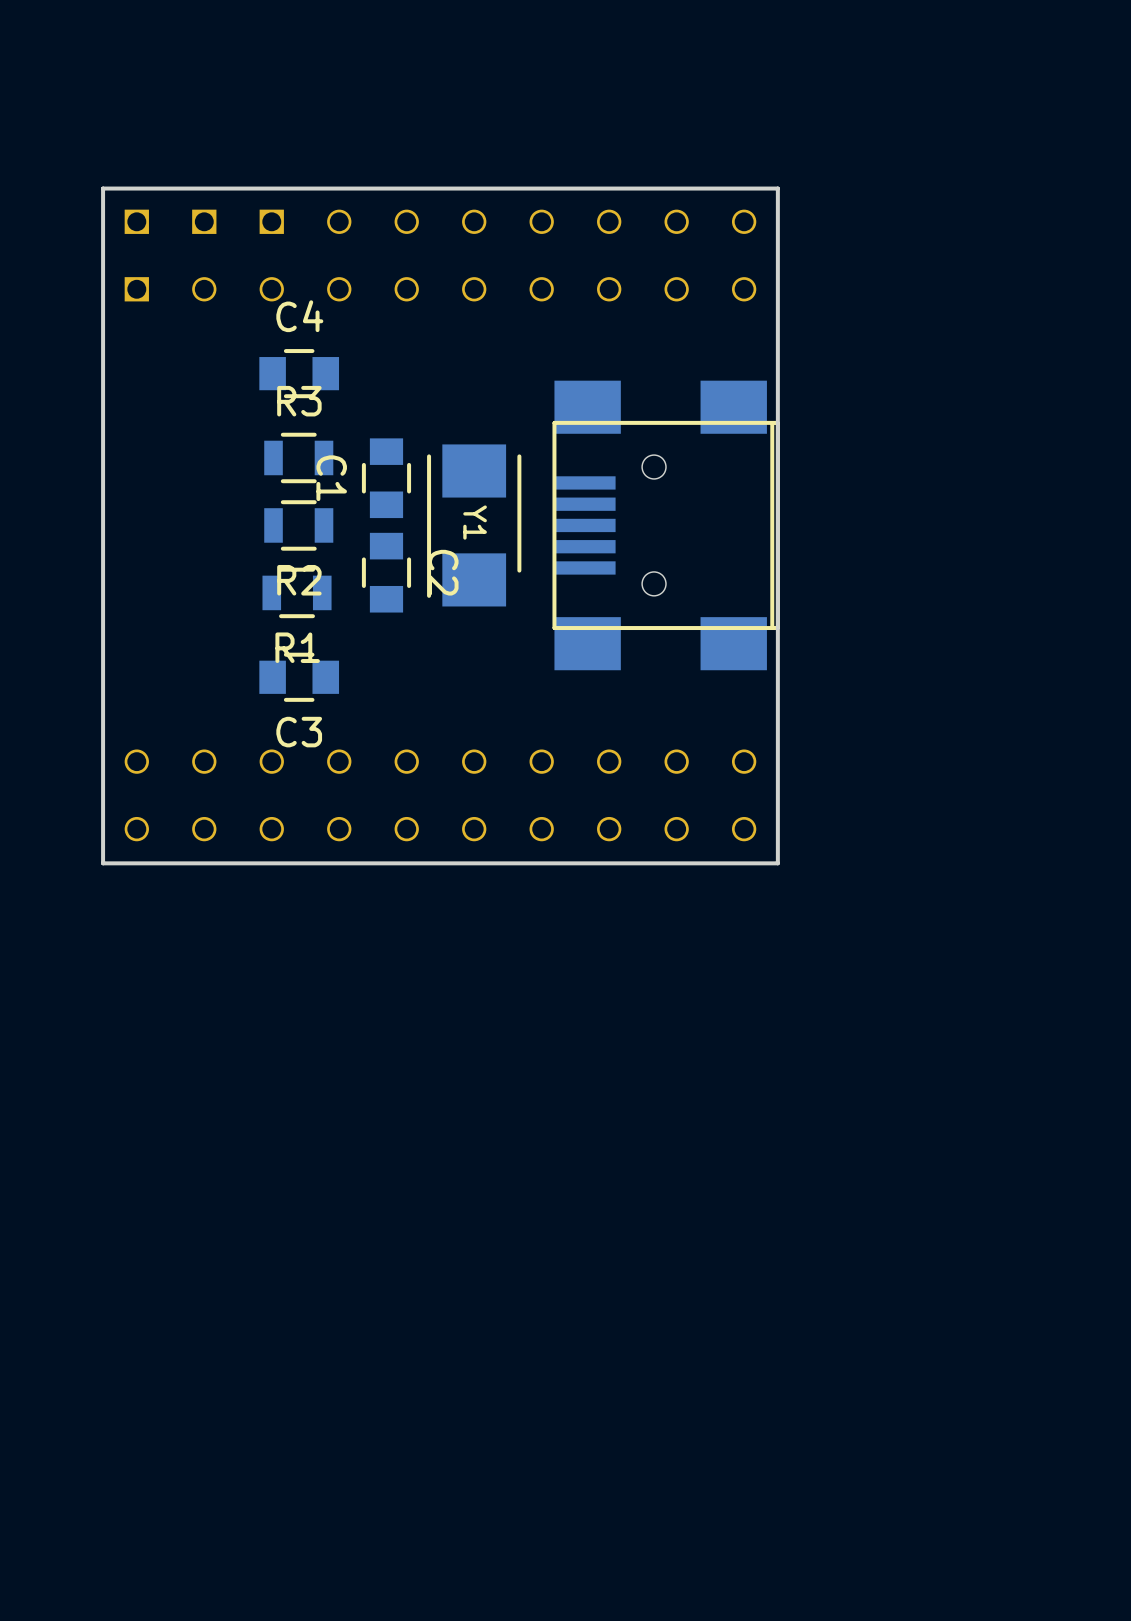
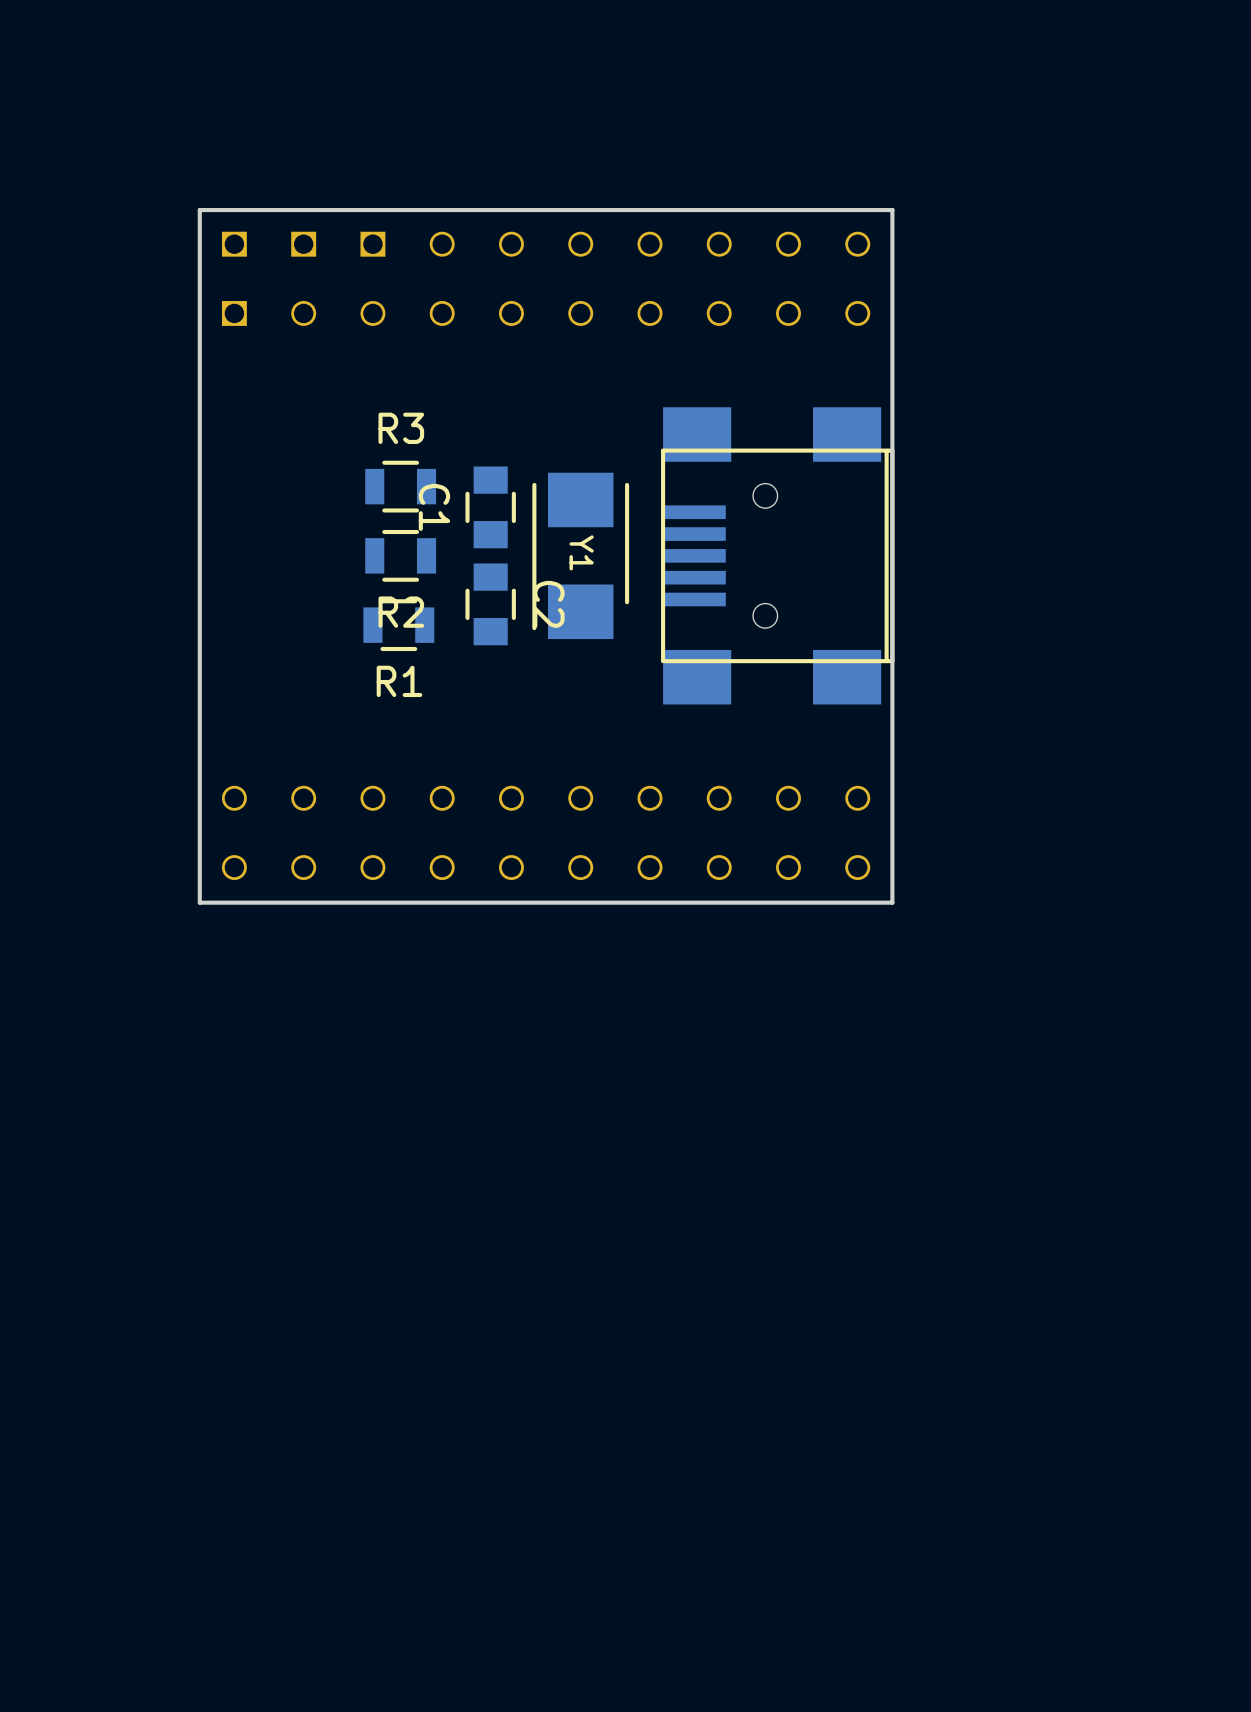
C4: (299, 373) -> none
C3: (299, 677) -> none

